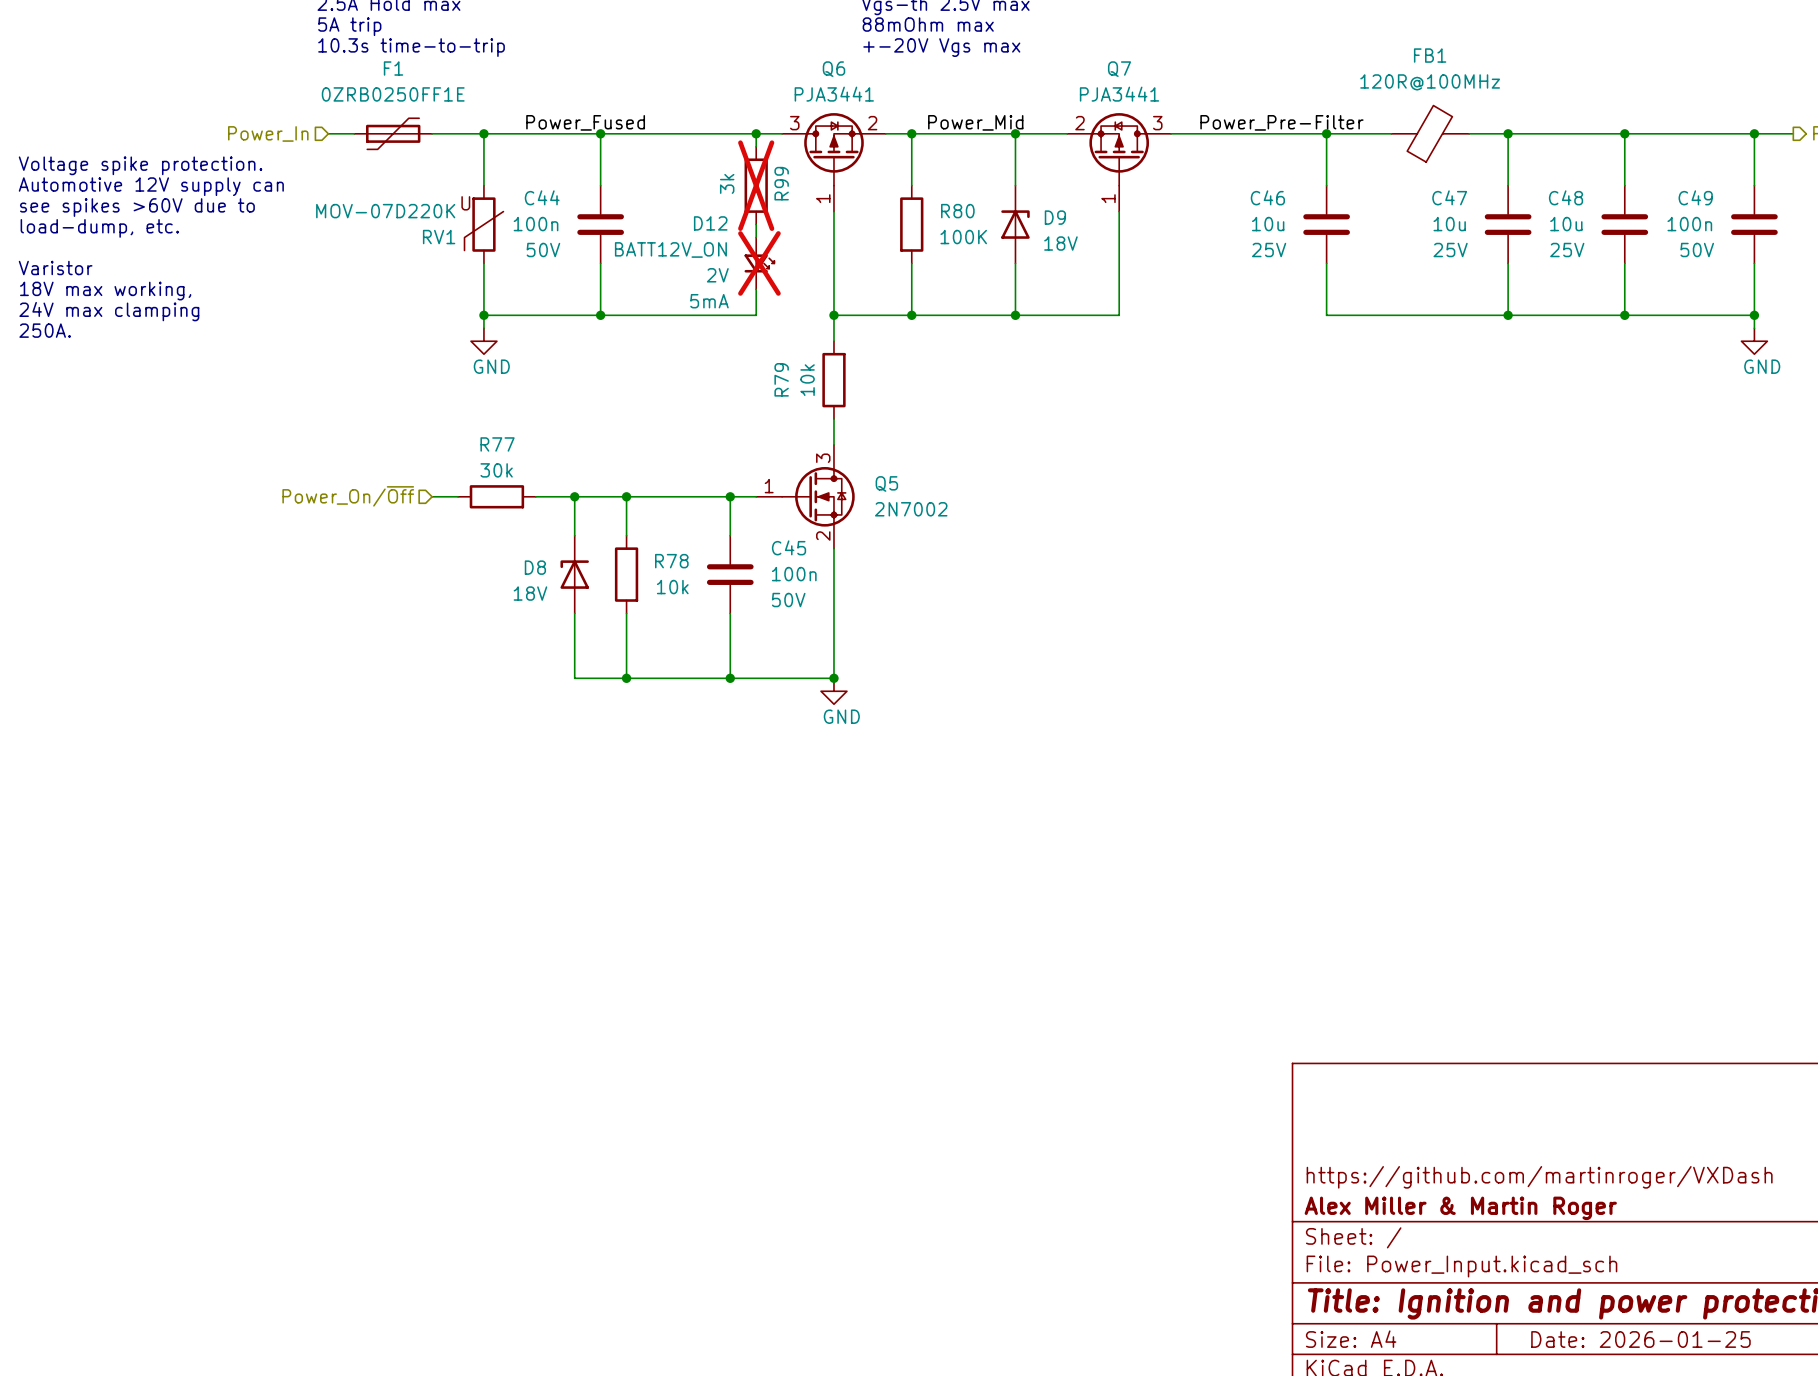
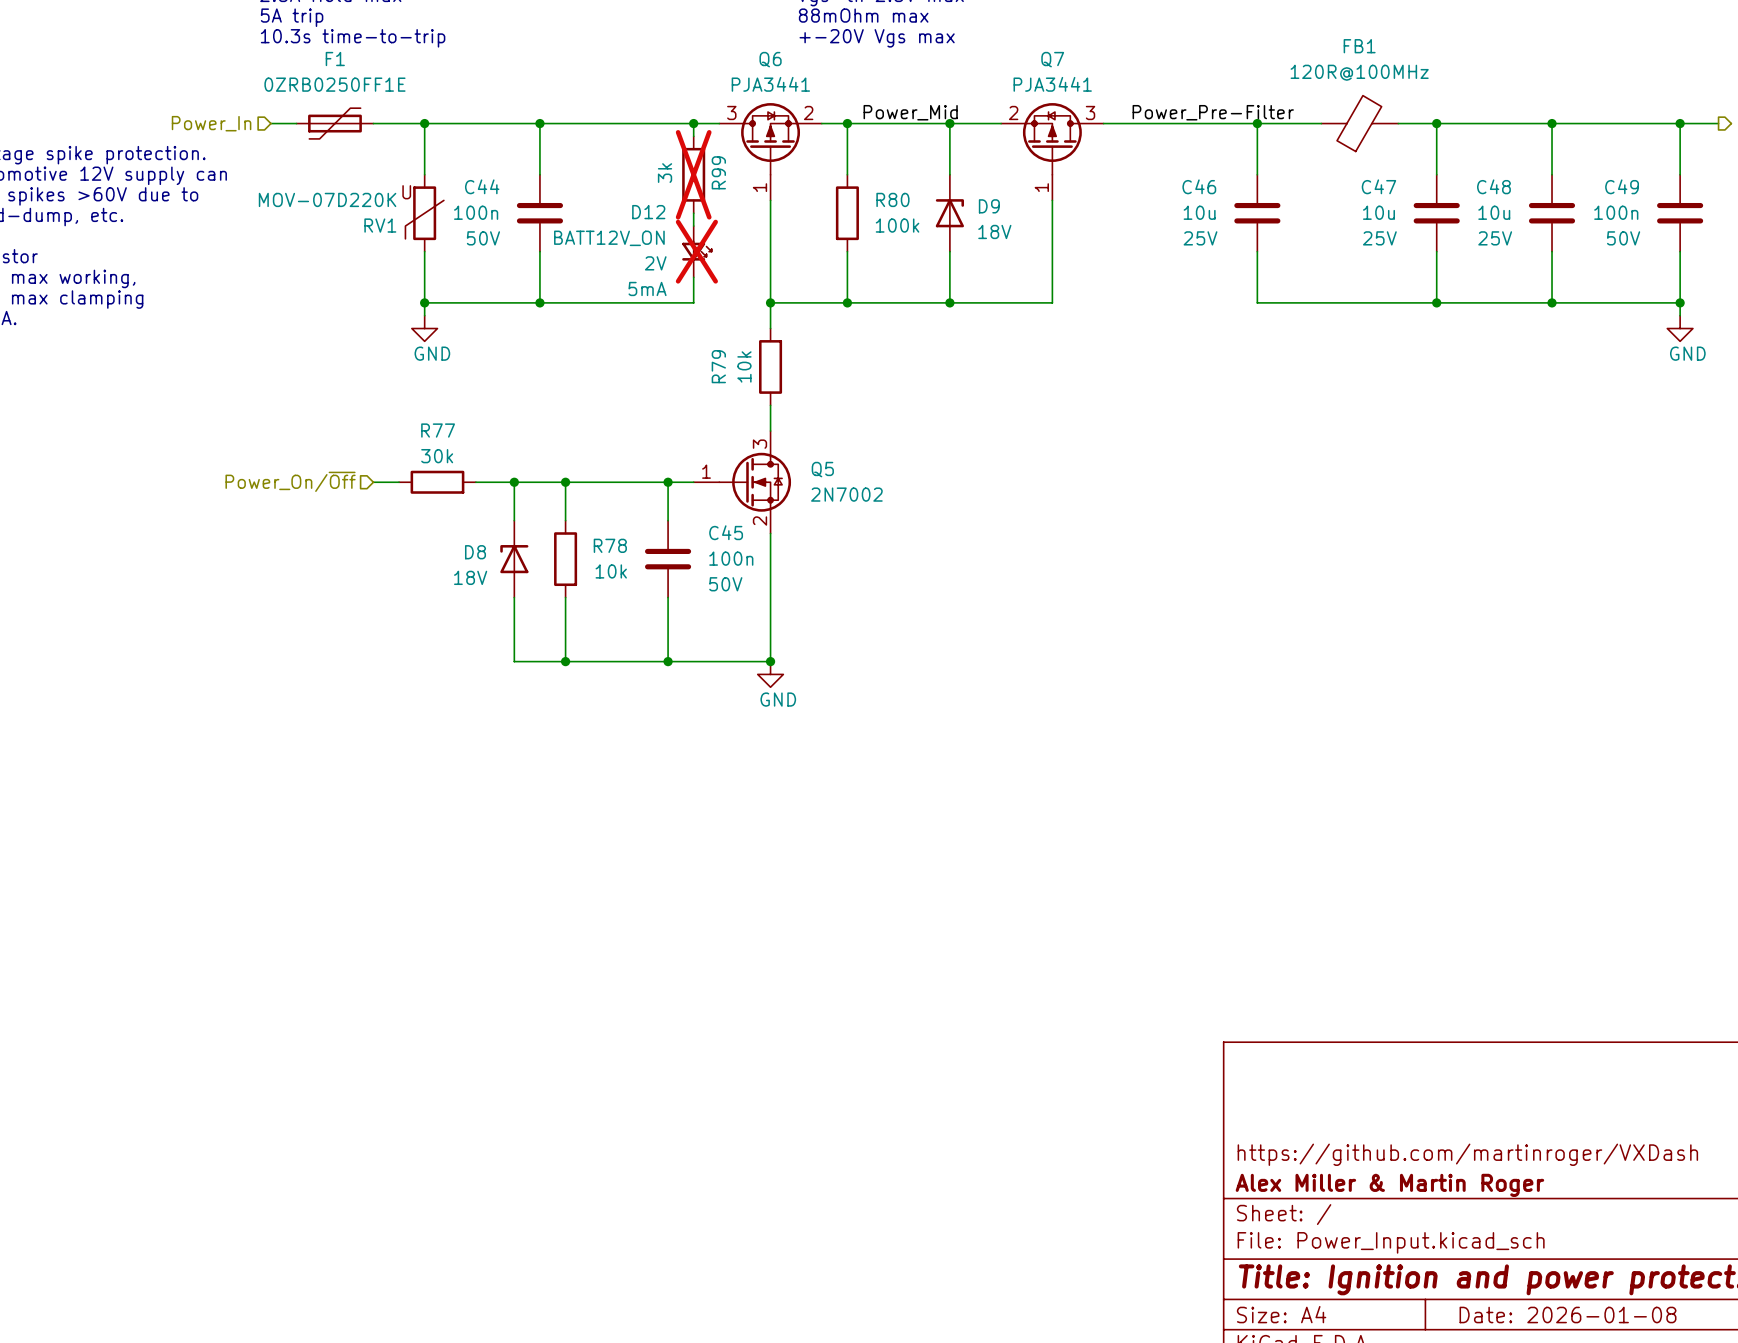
label: Power_Fused (585, 122) -> none
R80 value: 100K (963, 237) -> 100k (897, 225)
title block: Date: 2026-01-25 (1640, 1339) -> Date: 2026-01-08 (1568, 1315)

